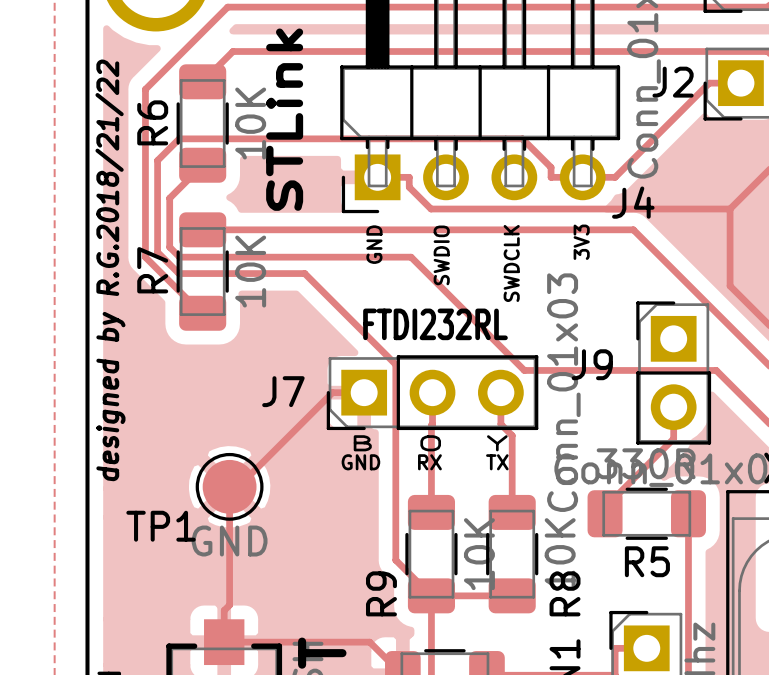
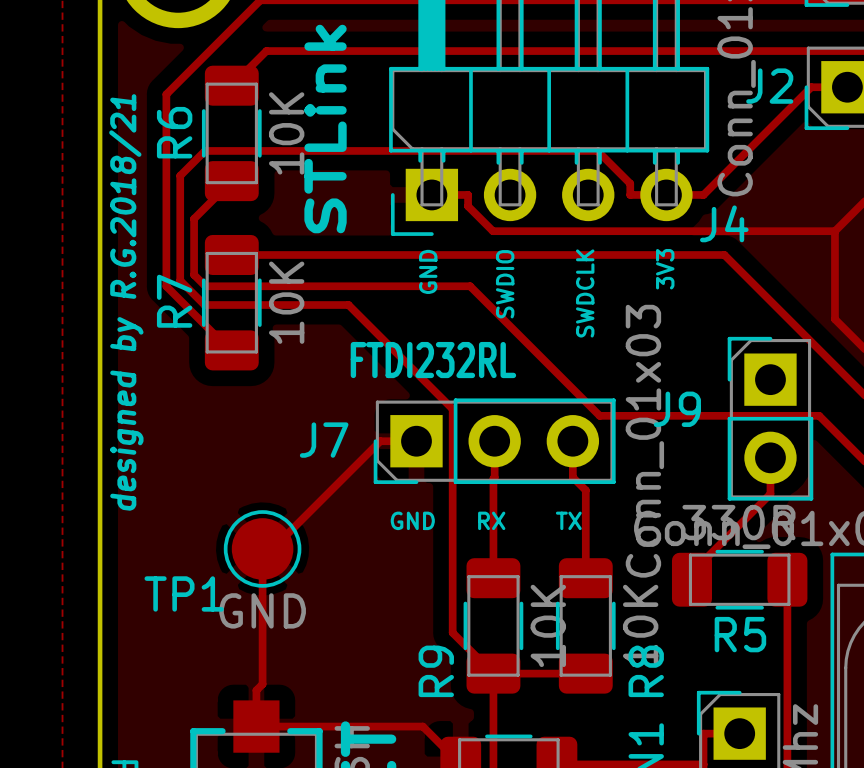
text: designed by R.G.2018/21/22 (110, 270) -> designed by R.G.2018/21 (126, 302)
text position: FTDI232RL (435, 324) -> FTDI232RL (433, 360)
text: B O Y (430, 443) -> none

